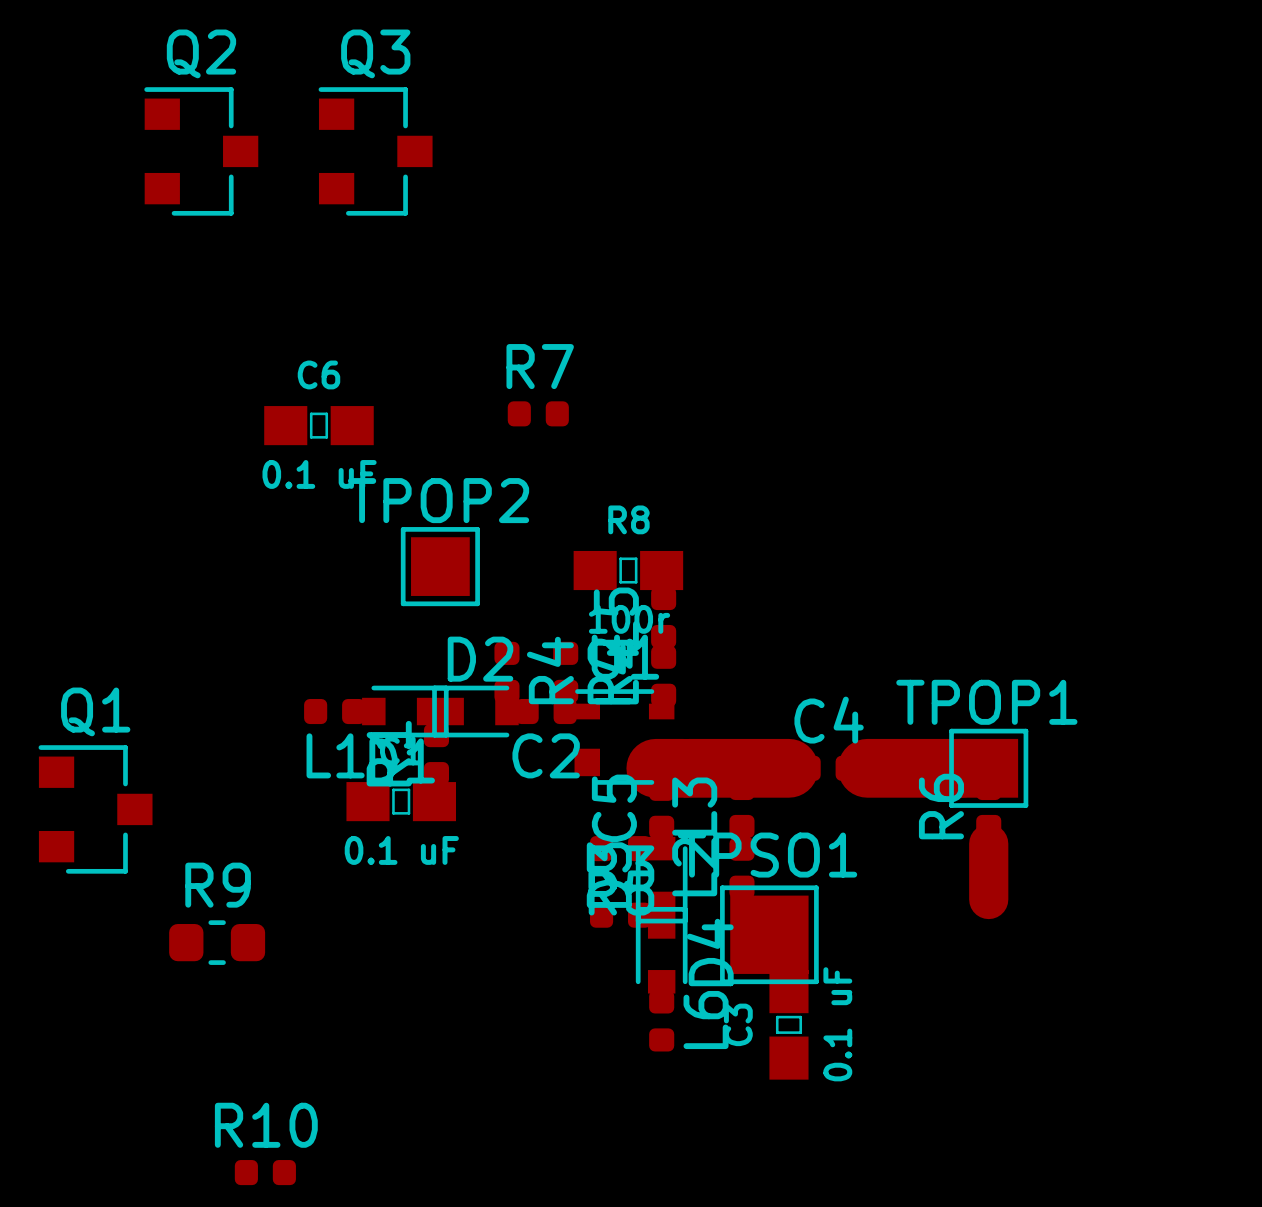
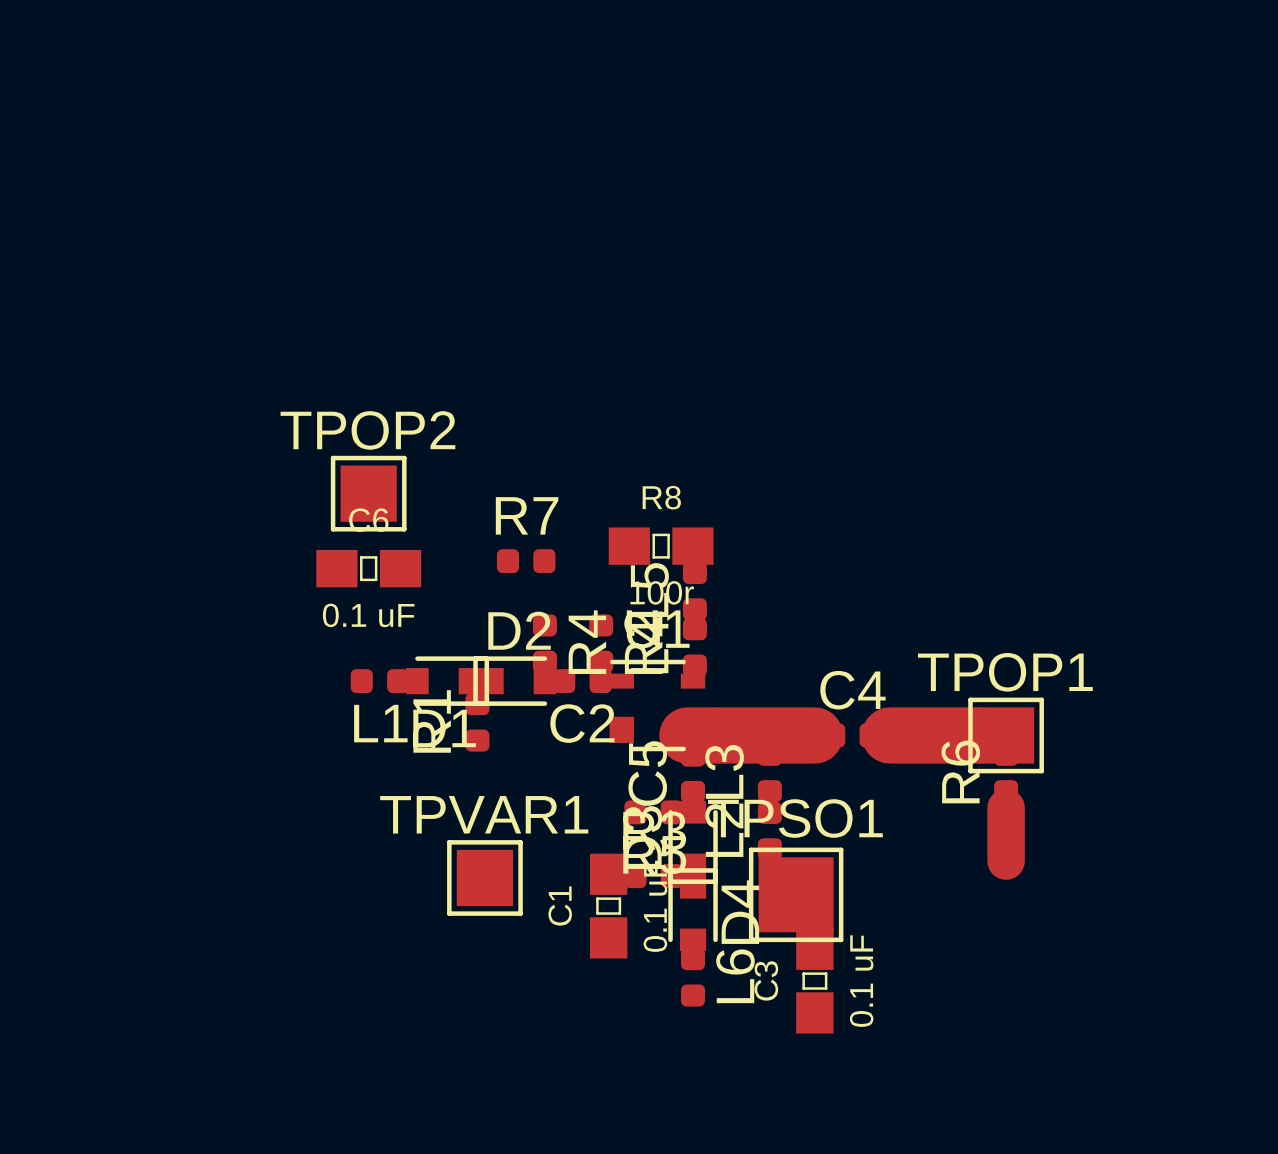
Q2: (201, 151) -> none
Q3: (375, 151) -> none
R7 position: (538, 413) -> (526, 561)
C6 position: (318, 425) -> (368, 568)
TPOP2 position: (440, 566) -> (368, 493)
C1 rotation: 0° (401, 801) -> 90° clockwise (608, 906)
C1 position: (401, 801) -> (608, 906)
Q1: (95, 809) -> none
TPVAR1: none -> (484, 877)
R9: (217, 942) -> none
R10: (265, 1172) -> none

